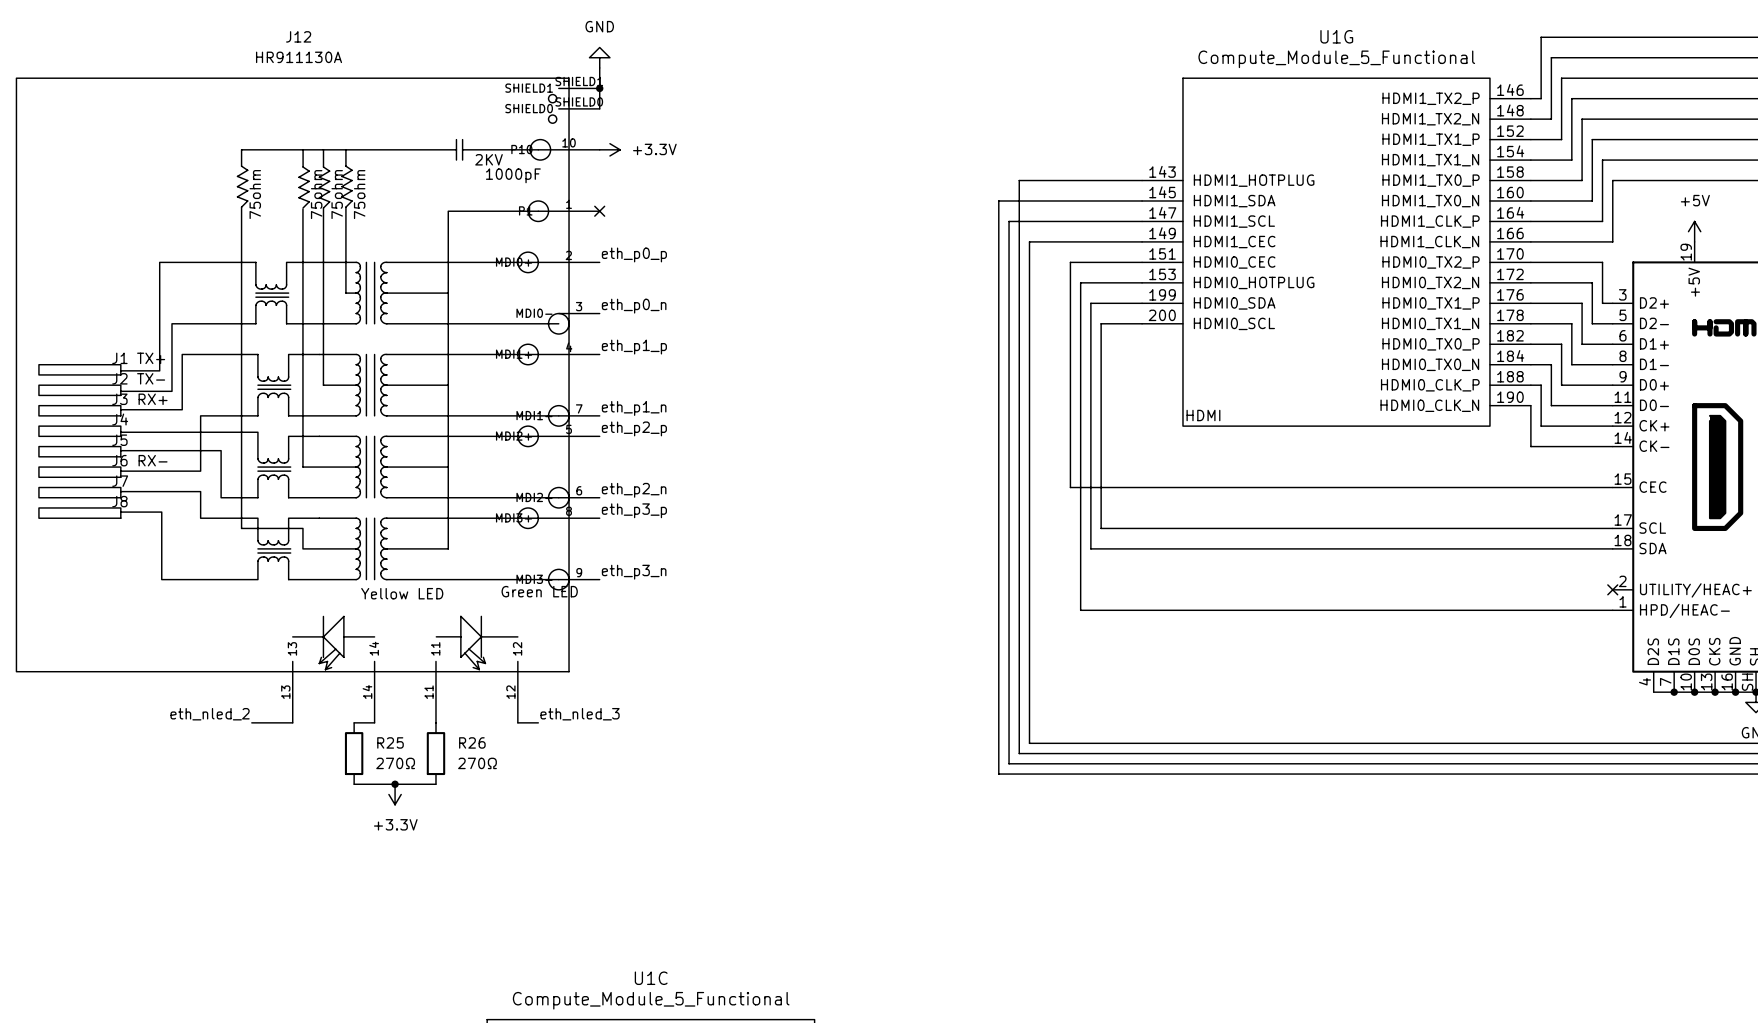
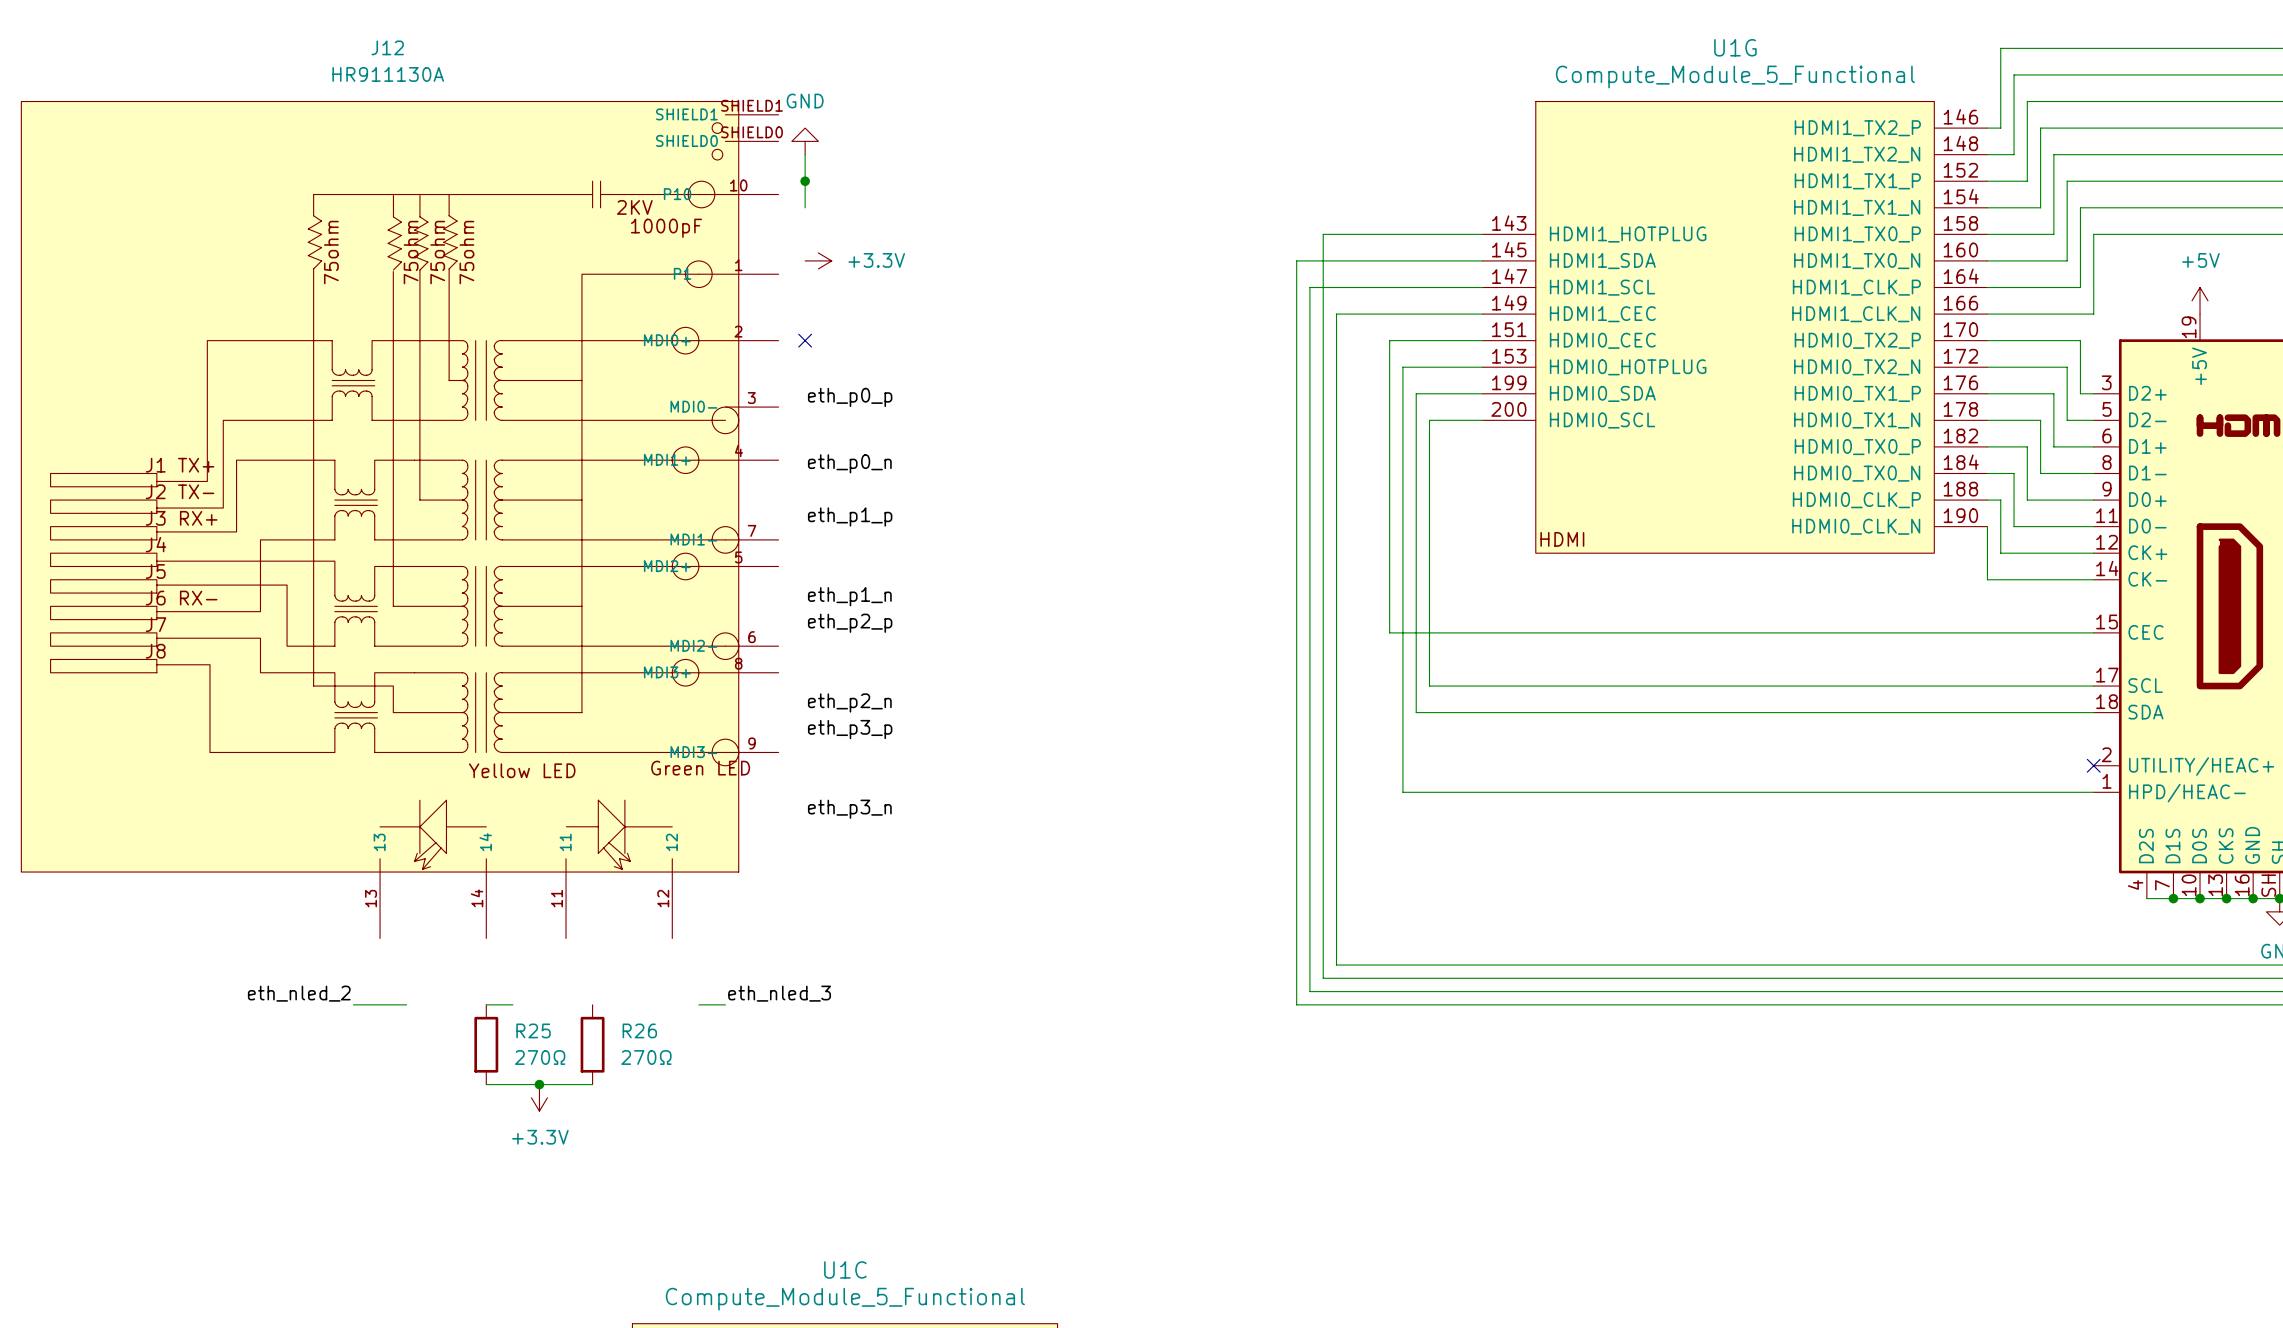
power symbol position: GND (599, 57) -> GND (805, 141)
wire: (599, 67) (599, 108) -> (805, 154) (805, 207)
junction: (599, 88) -> none
junction: none -> (805, 181)
power symbol position: +3.3V (609, 149) -> +3.3V (818, 260)
no-connect mark: (599, 211) -> none
label position: eth_p0_p (634, 254) -> eth_p0_p (850, 397)
no-connect mark: none -> (805, 340)
label position: eth_p0_n (634, 306) -> eth_p0_n (849, 463)
label position: eth_p1_p (634, 347) -> eth_p1_p (850, 516)
label position: eth_p1_n (634, 408) -> eth_p1_n (849, 596)
label position: eth_p2_p (634, 428) -> eth_p2_p (850, 623)
label position: eth_p2_n (634, 490) -> eth_p2_n (849, 702)
label position: eth_p3_p (634, 510) -> eth_p3_p (850, 729)
label position: eth_p3_n (634, 572) -> eth_p3_n (849, 809)
label position: eth_nled_2 (210, 714) -> eth_nled_2 (299, 993)
label position: eth_nled_3 (580, 714) -> eth_nled_3 (779, 993)
wire: (251, 722) (292, 722) -> (353, 1004) (406, 1004)
wire: (354, 722) (374, 722) -> (486, 1004) (512, 1004)
wire: (517, 722) (538, 722) -> (698, 1004) (725, 1004)
R25 position: (354, 753) -> (486, 1044)
R26 position: (435, 753) -> (592, 1044)
wire: (354, 784) (435, 784) -> (486, 1084) (592, 1084)
junction: (395, 784) -> none
power symbol position: +3.3V (395, 794) -> +3.3V (539, 1097)
junction: none -> (539, 1084)

